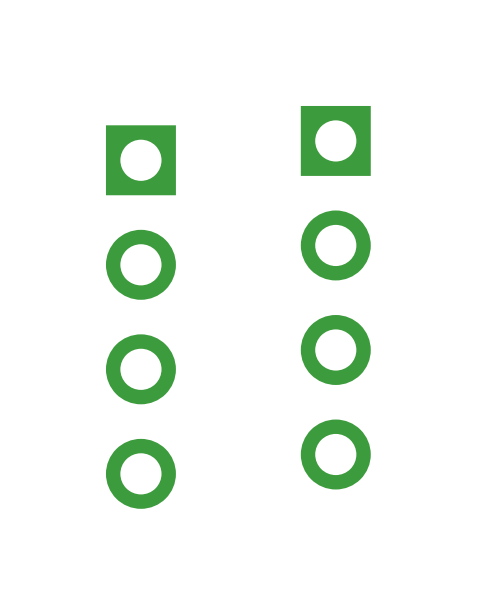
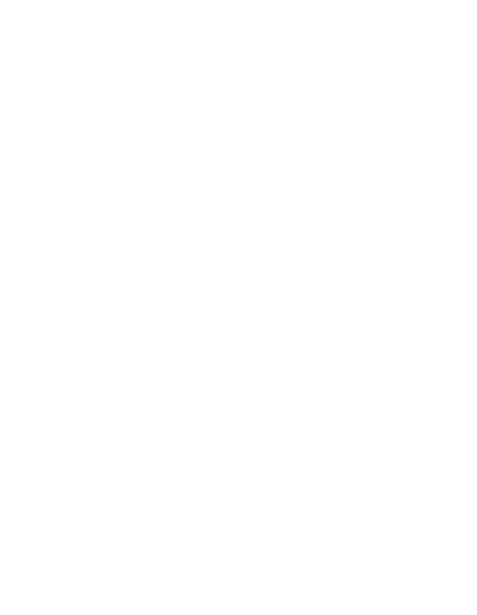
part: (335, 297) -> none
part: (140, 317) -> none

